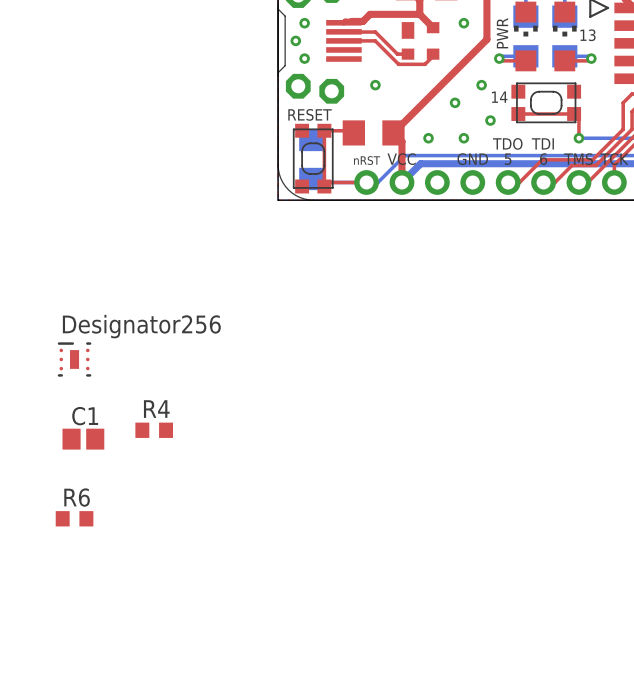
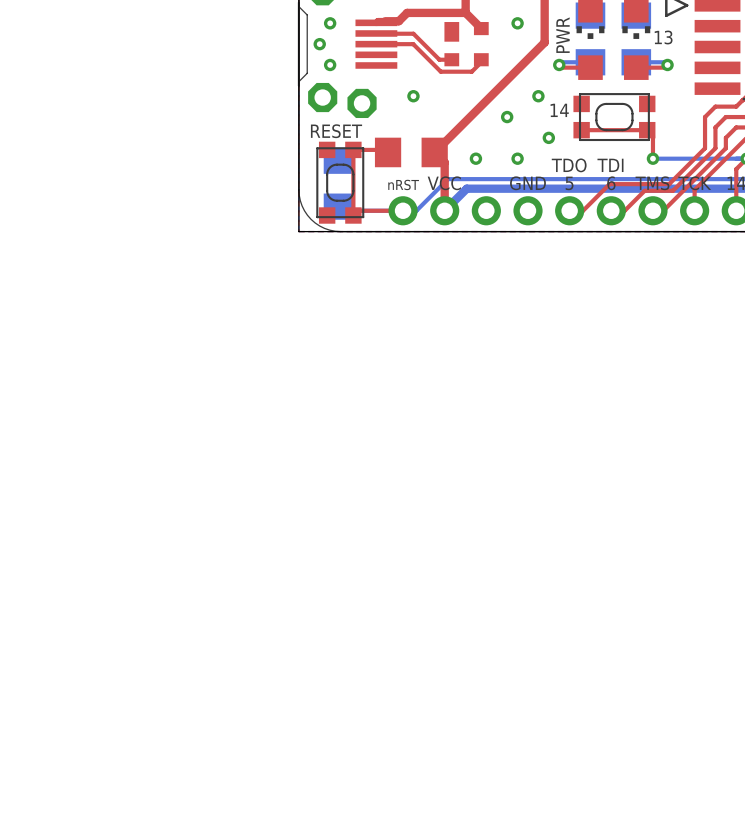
part: (74, 359) -> none
R4: (154, 430) -> none
C1: (83, 439) -> none
R6: (74, 518) -> none

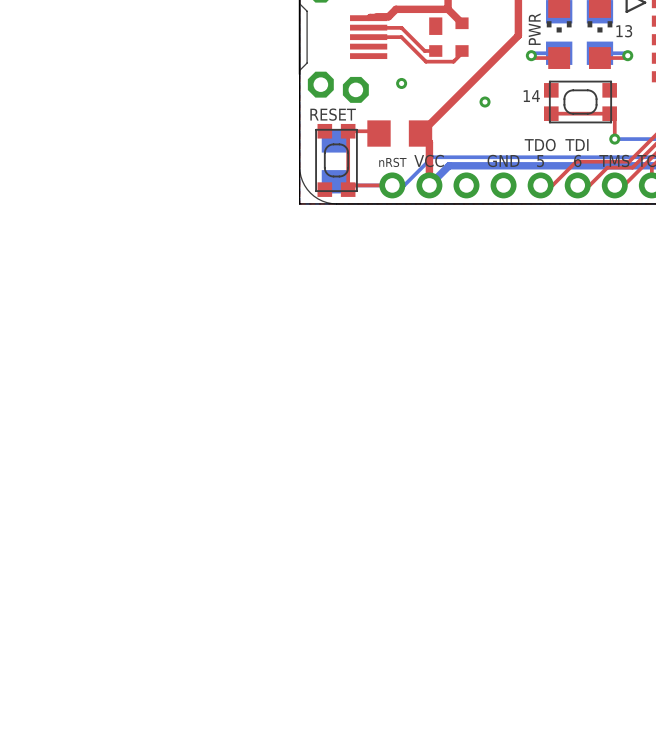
via: (330, 23) -> none
via: (517, 23) -> none
via: (319, 44) -> none
via: (330, 64) -> none
via: (538, 96) -> none
via: (548, 137) -> none
via: (475, 158) -> none
via: (517, 158) -> none

